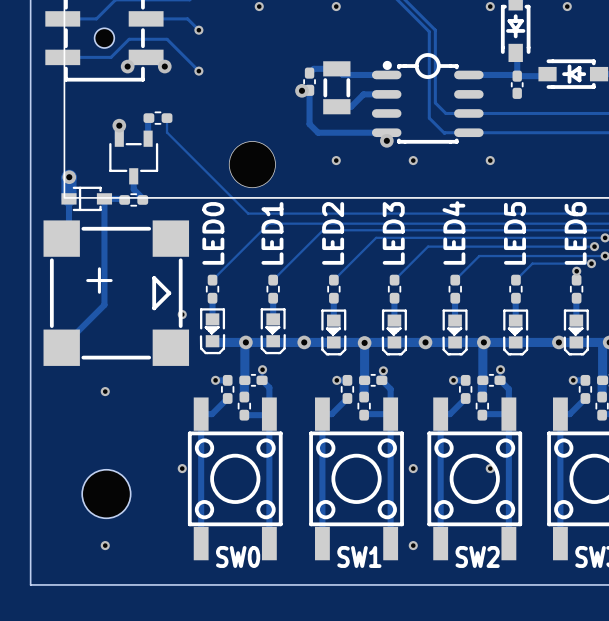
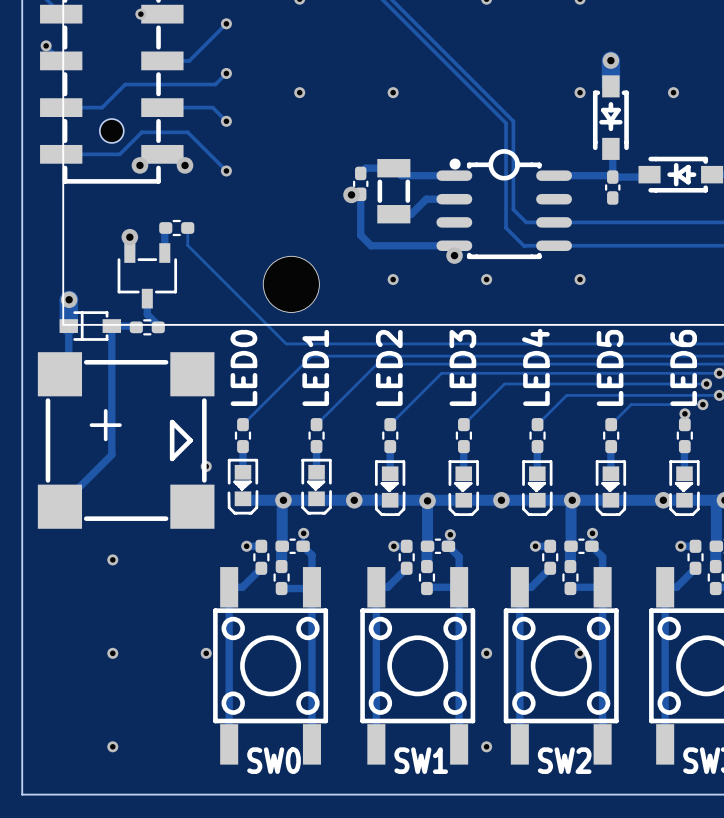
via: none -> (112, 653)
part: (106, 494) -> none

